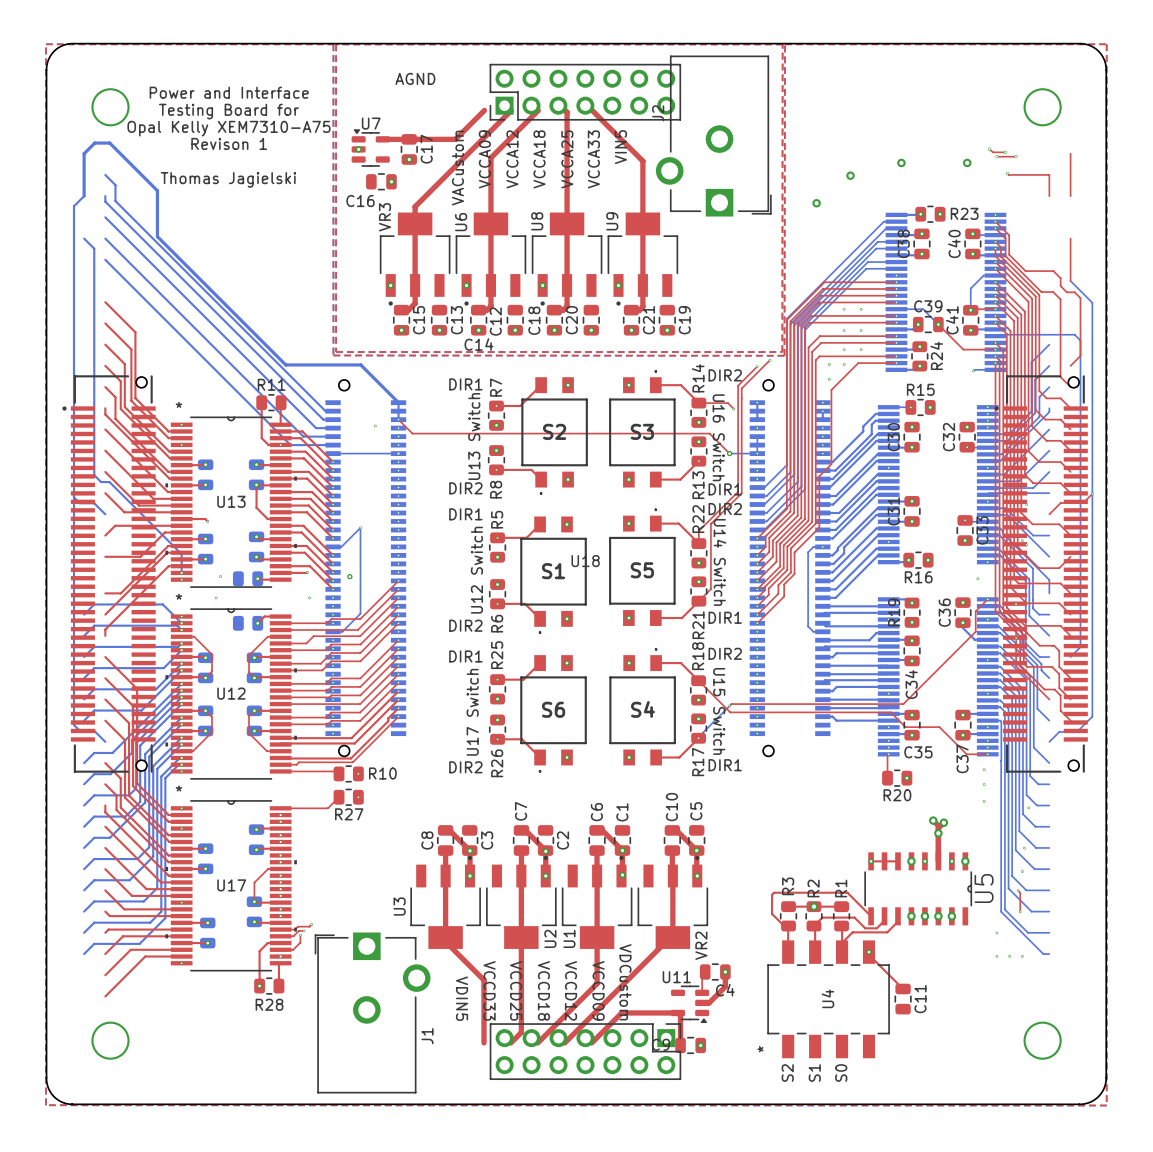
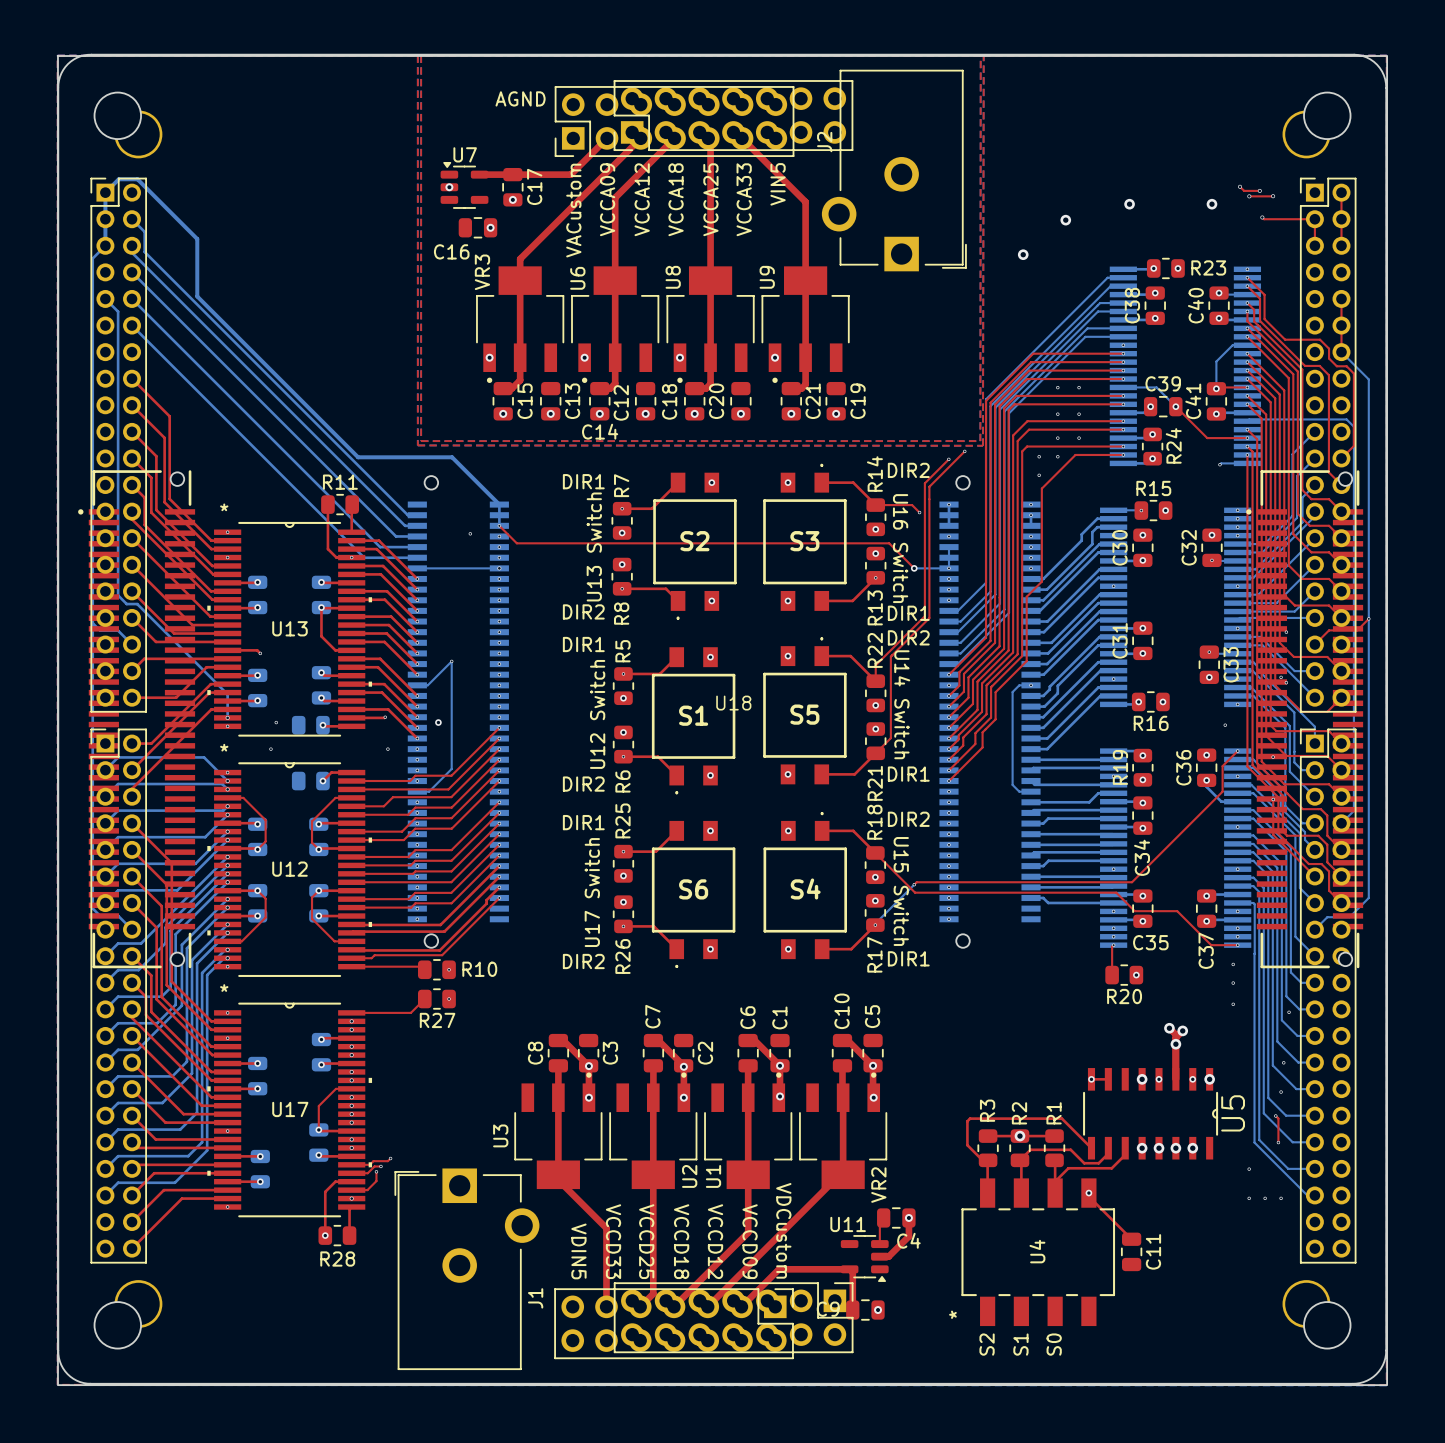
text: Power and Interface (229, 92) -> none
text: Testing Board for (228, 111) -> none
text: Opal Kelly XEM7310-A75 (228, 128) -> none
text: Revison 1 (229, 143) -> none
text: Thomas Jagielski (228, 179) -> none
part: none -> (722, 720)
top track: (884, 861) (898, 861) -> none

